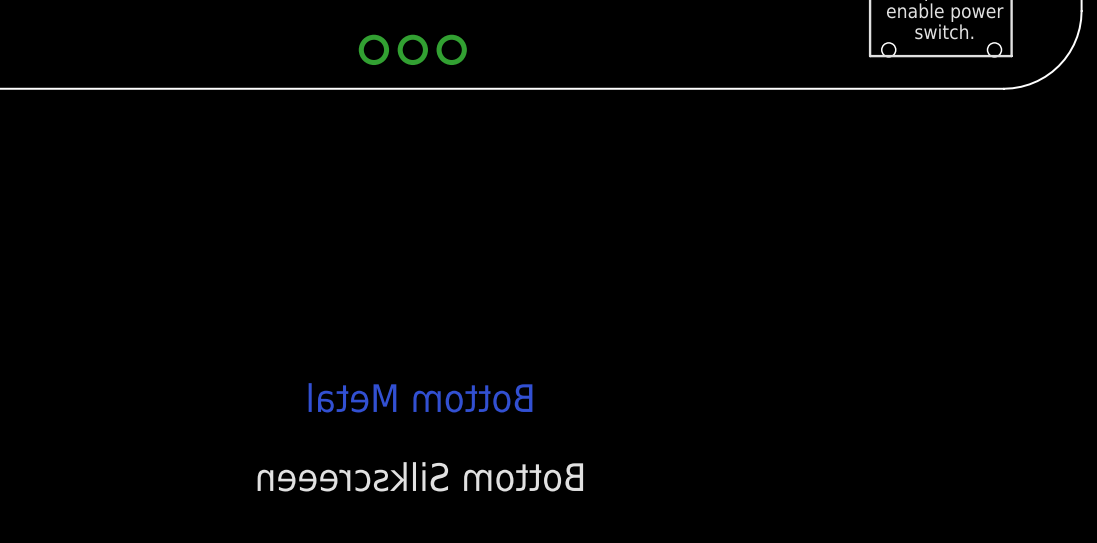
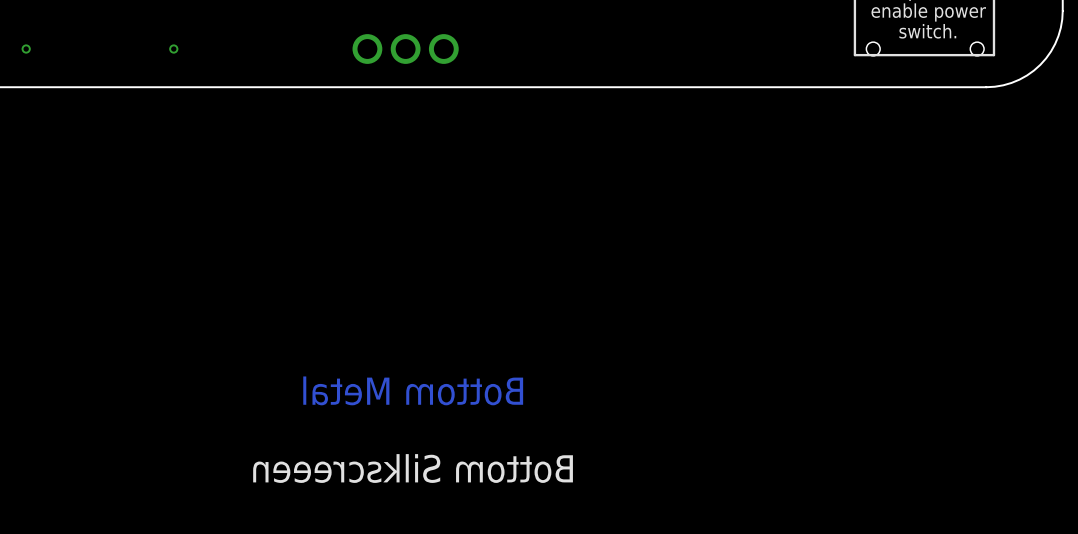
via: none -> (26, 49)
via: none -> (173, 49)

